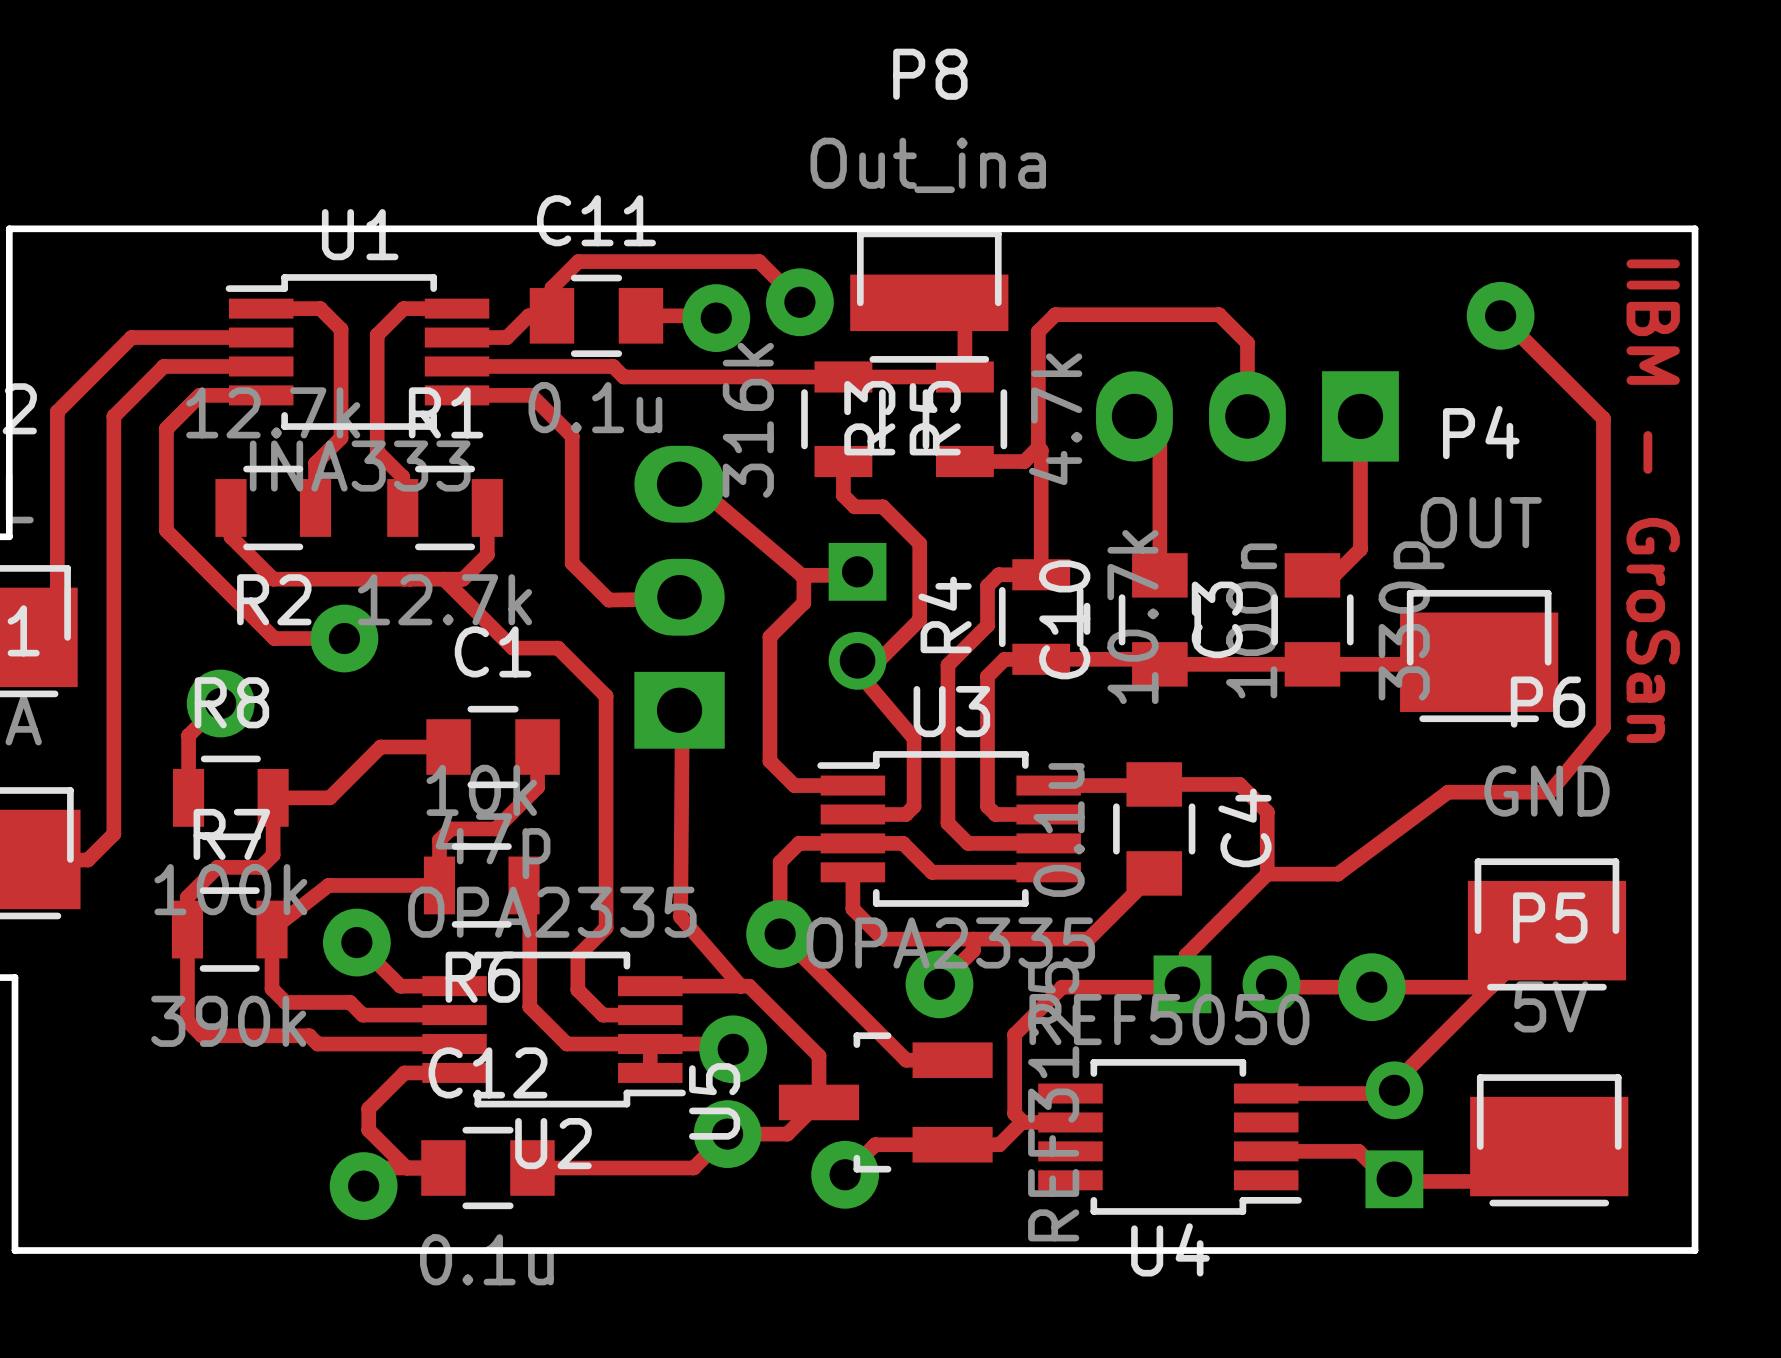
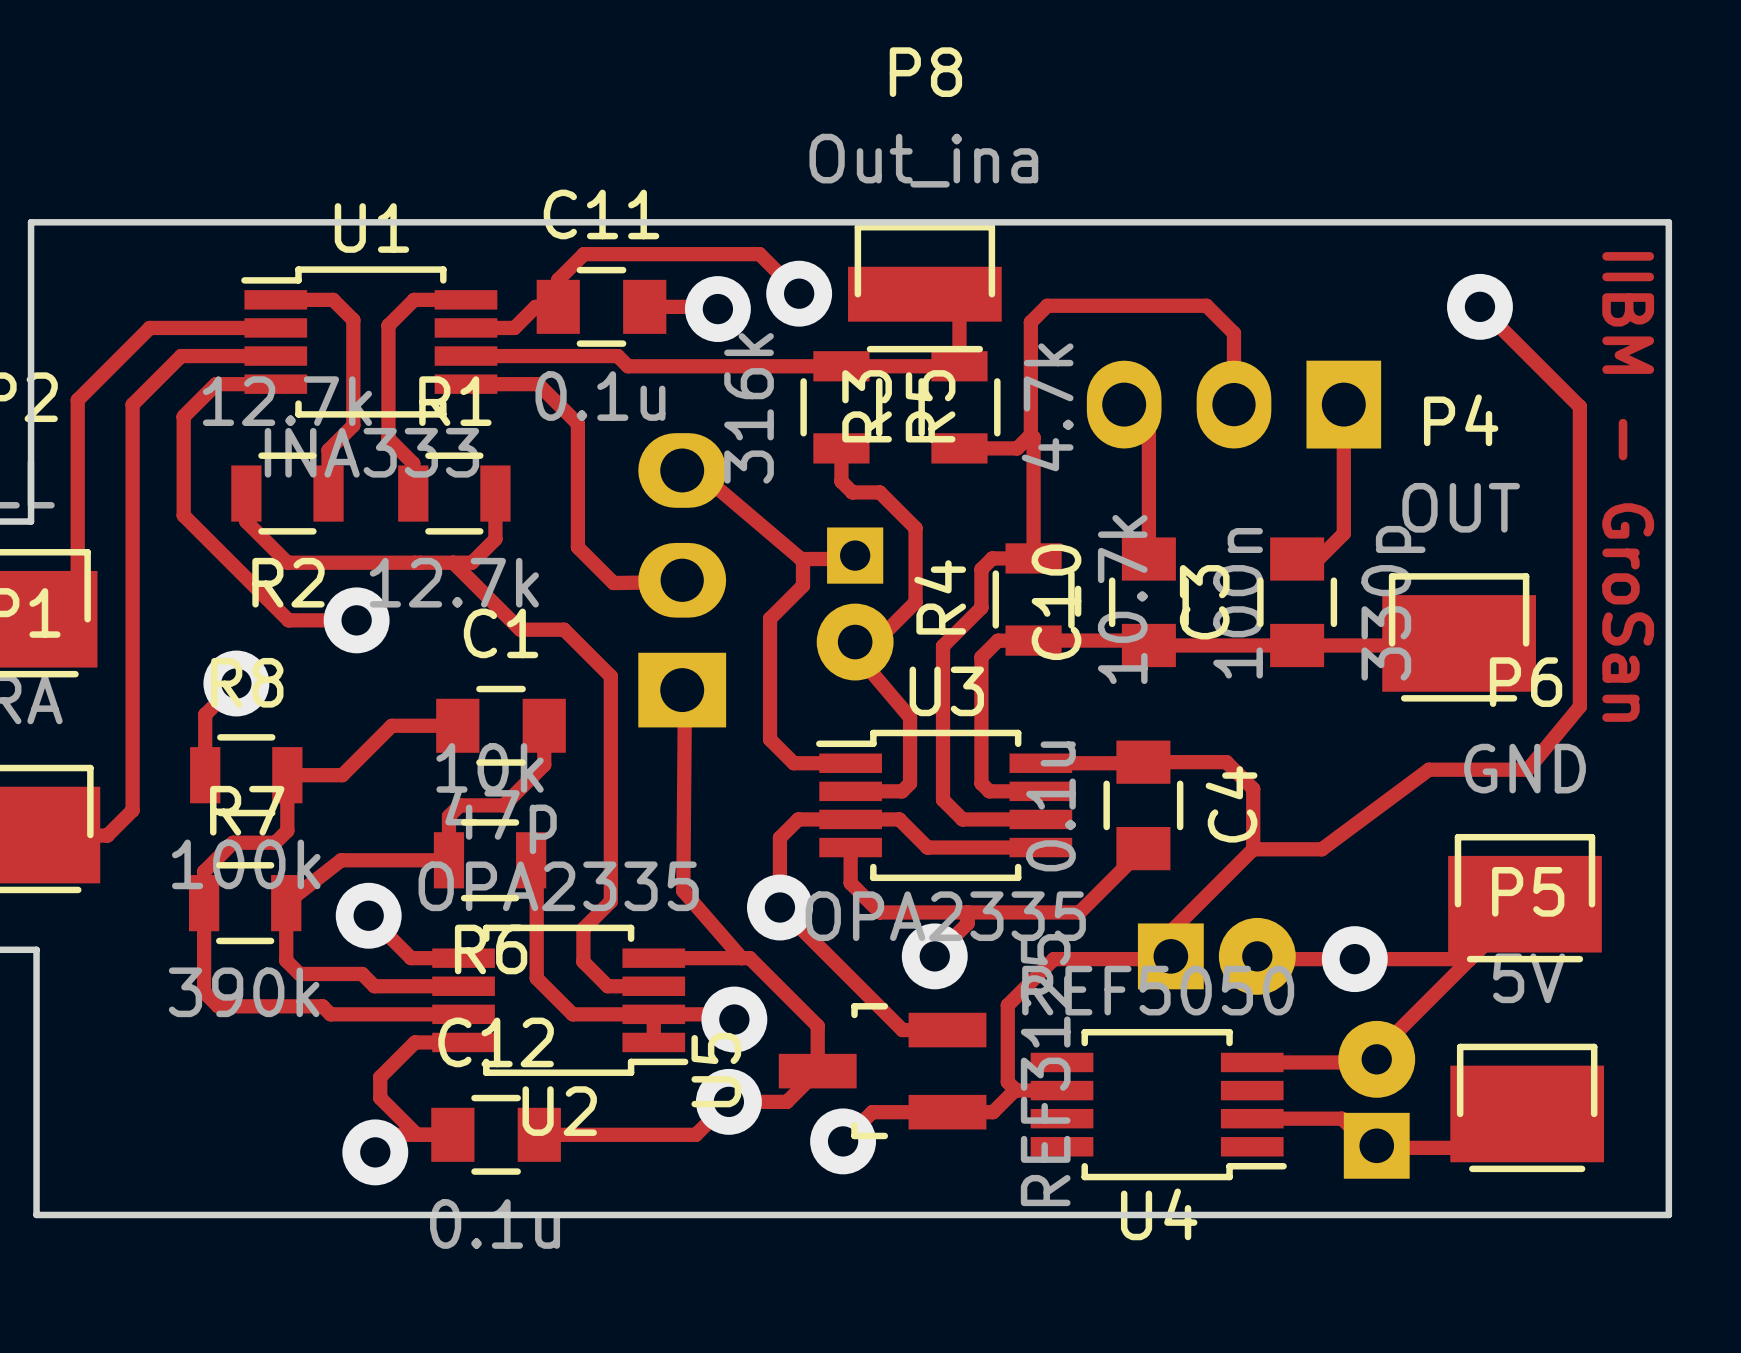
part footprint: [828, 542, 887, 690] -> [816, 527, 894, 681]
part footprint: [1153, 955, 1301, 1014] -> [1137, 917, 1296, 995]
part footprint: [1365, 1061, 1424, 1209] -> [1338, 1020, 1416, 1179]

